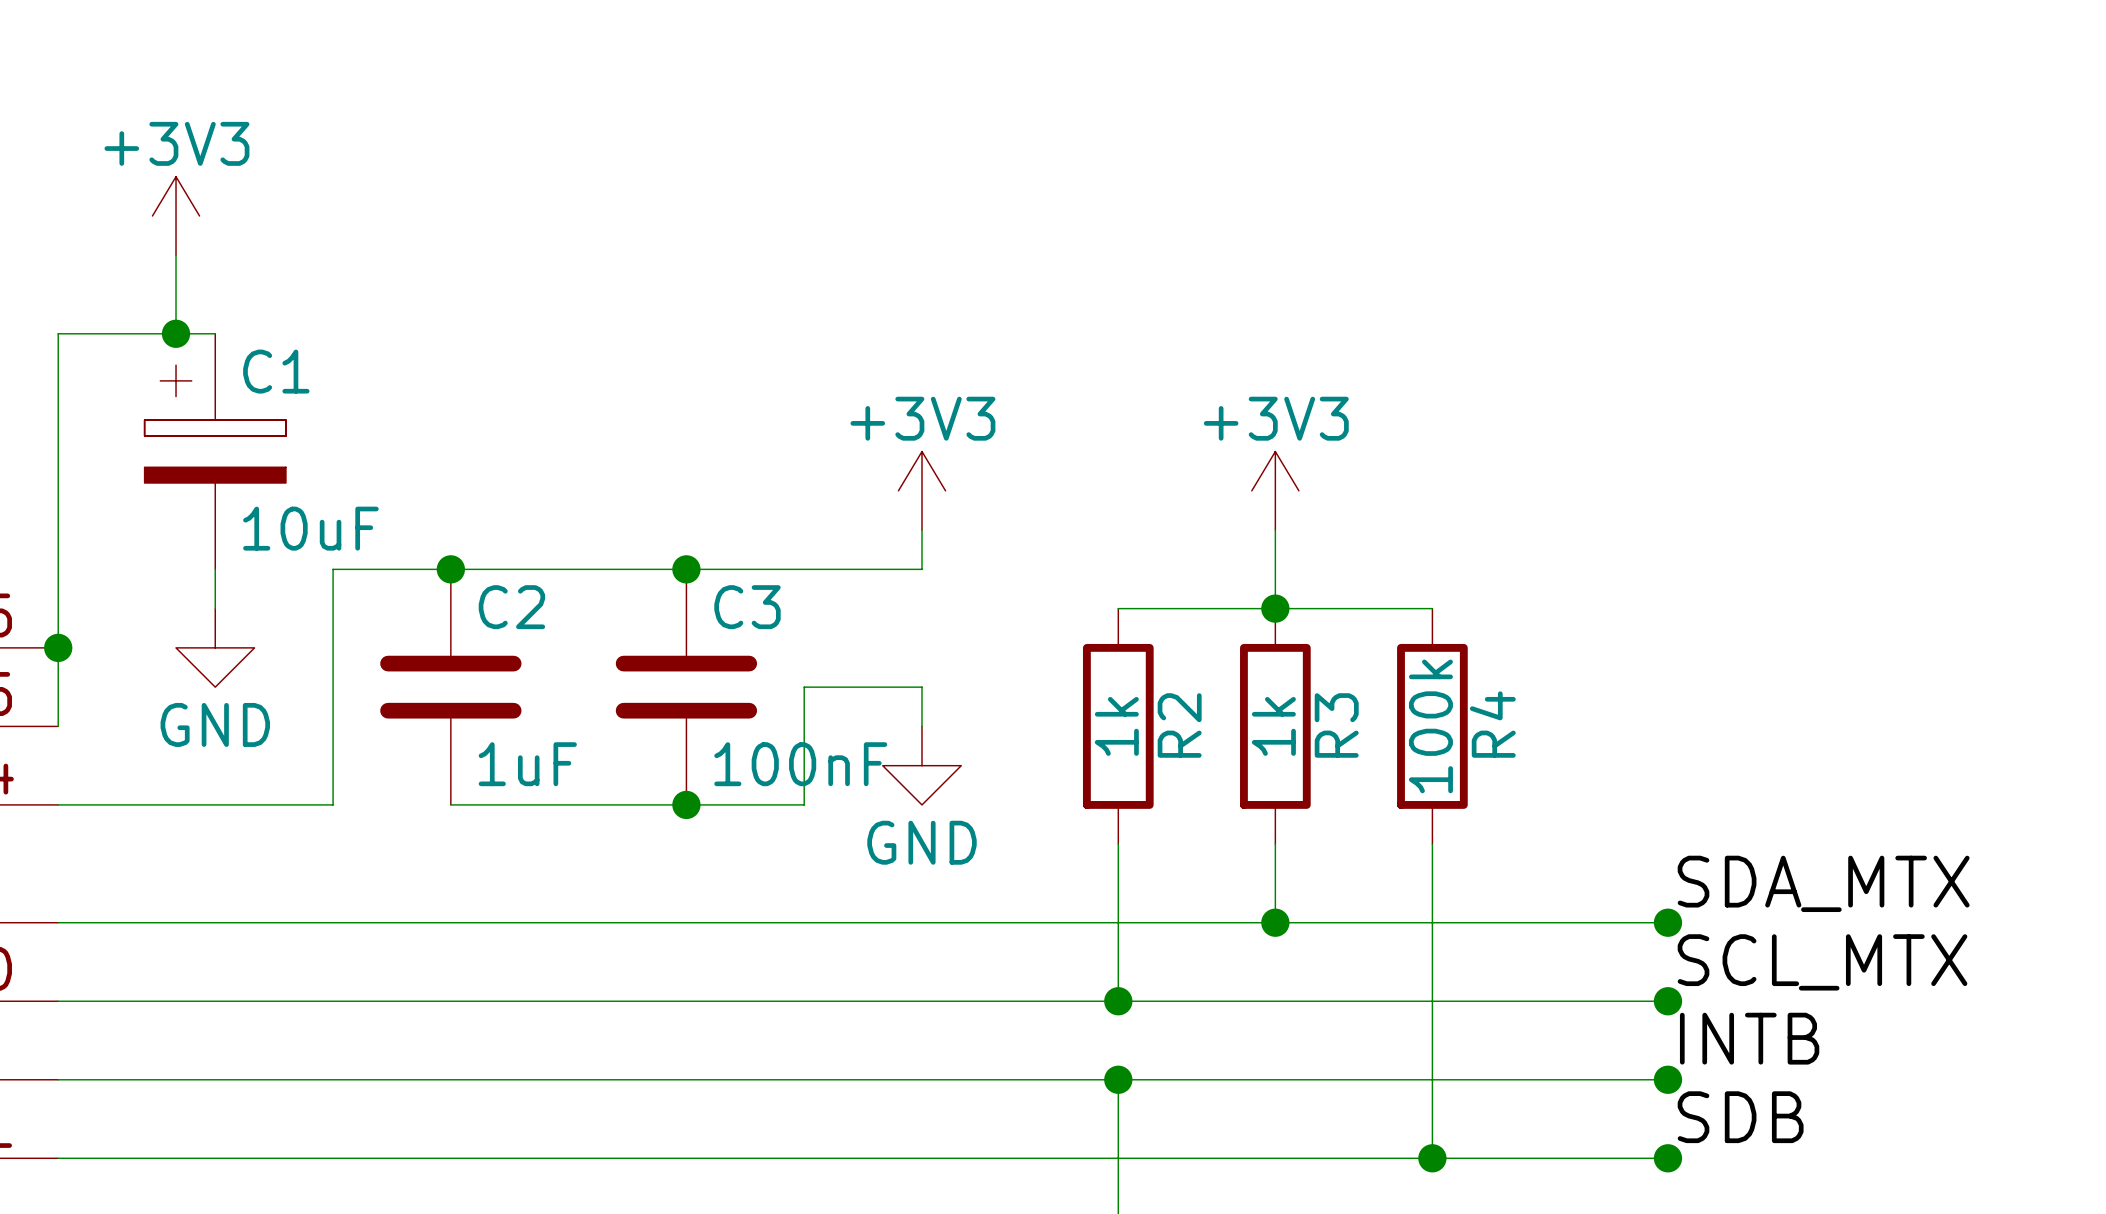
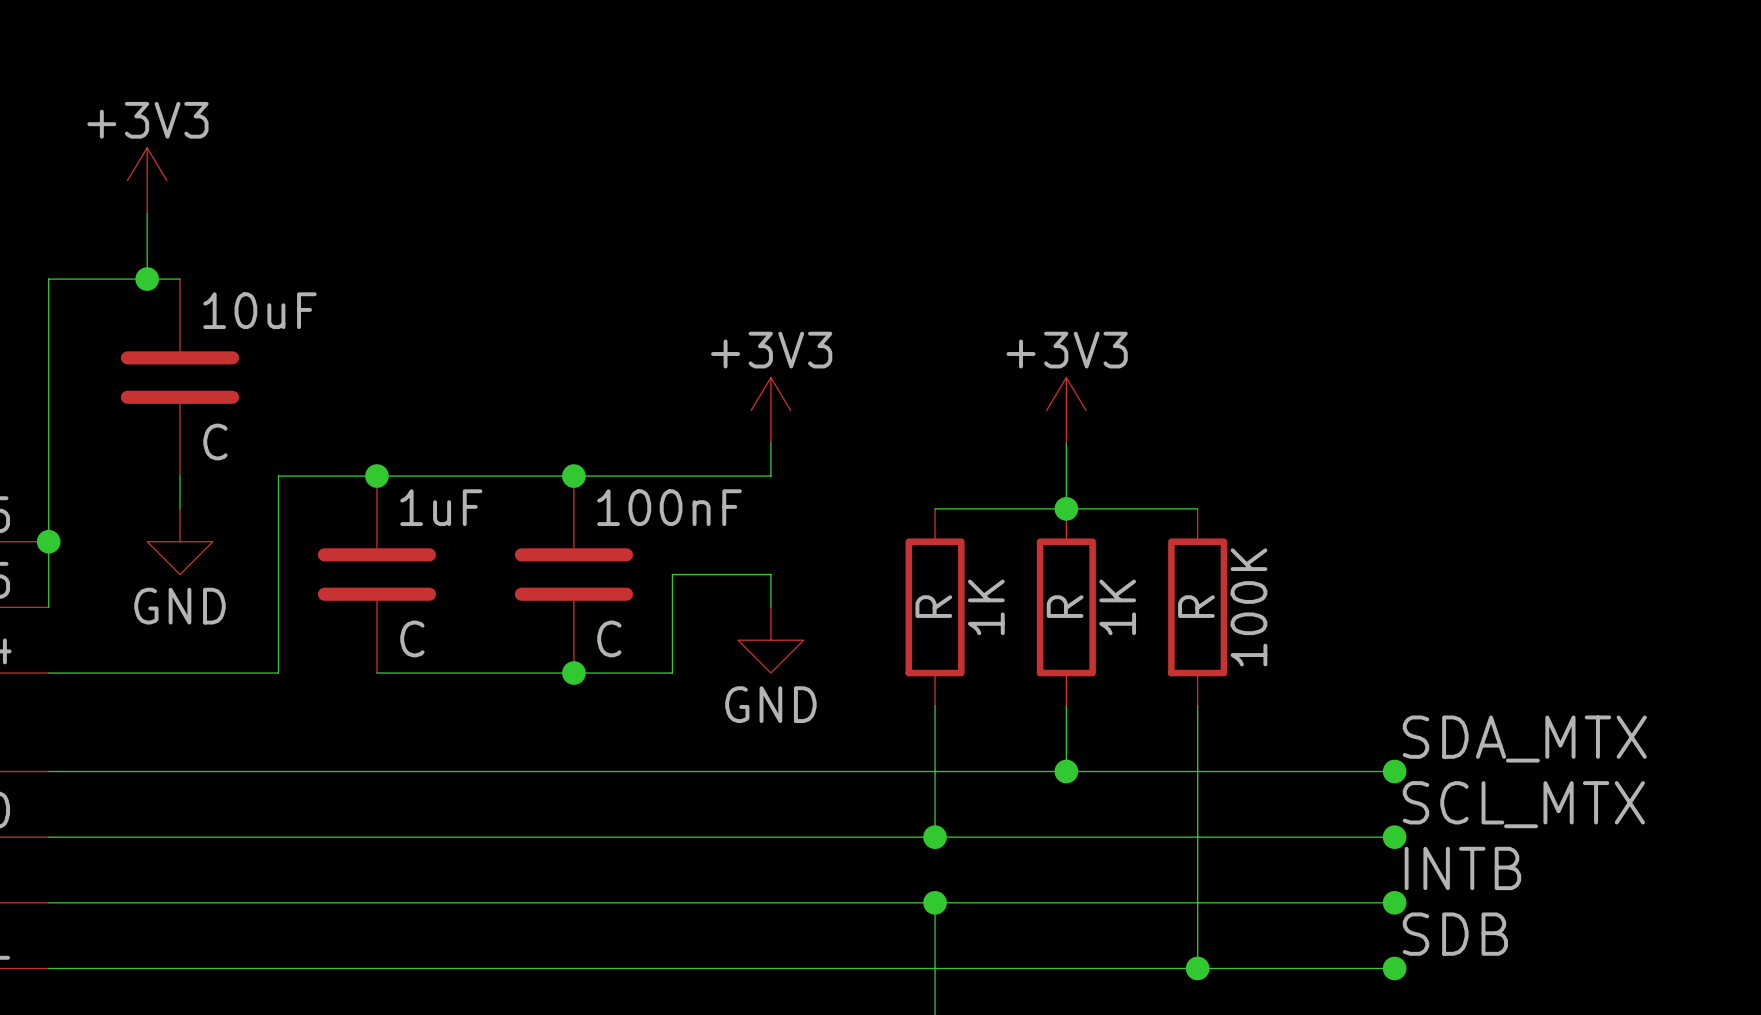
C1: 10uF (215, 451) -> none
10uF: none -> C (180, 377)
C2 name: C2 (511, 607) -> 1uF (441, 507)
C3 name: C3 (747, 607) -> 100nF (669, 507)
R4 name: R4 (1492, 724) -> 100K (1248, 607)
R2 name: R2 (1179, 725) -> 1K (986, 607)
R3 name: R3 (1336, 725) -> 1K (1117, 607)
R2 value: 1k (1116, 726) -> R (933, 606)
R3 value: 1k (1273, 726) -> R (1065, 606)
R4 value: 100k (1430, 726) -> R (1196, 606)
C2 value: 1uF (527, 764) -> C (412, 638)
C3 value: 100nF (800, 764) -> C (609, 638)

